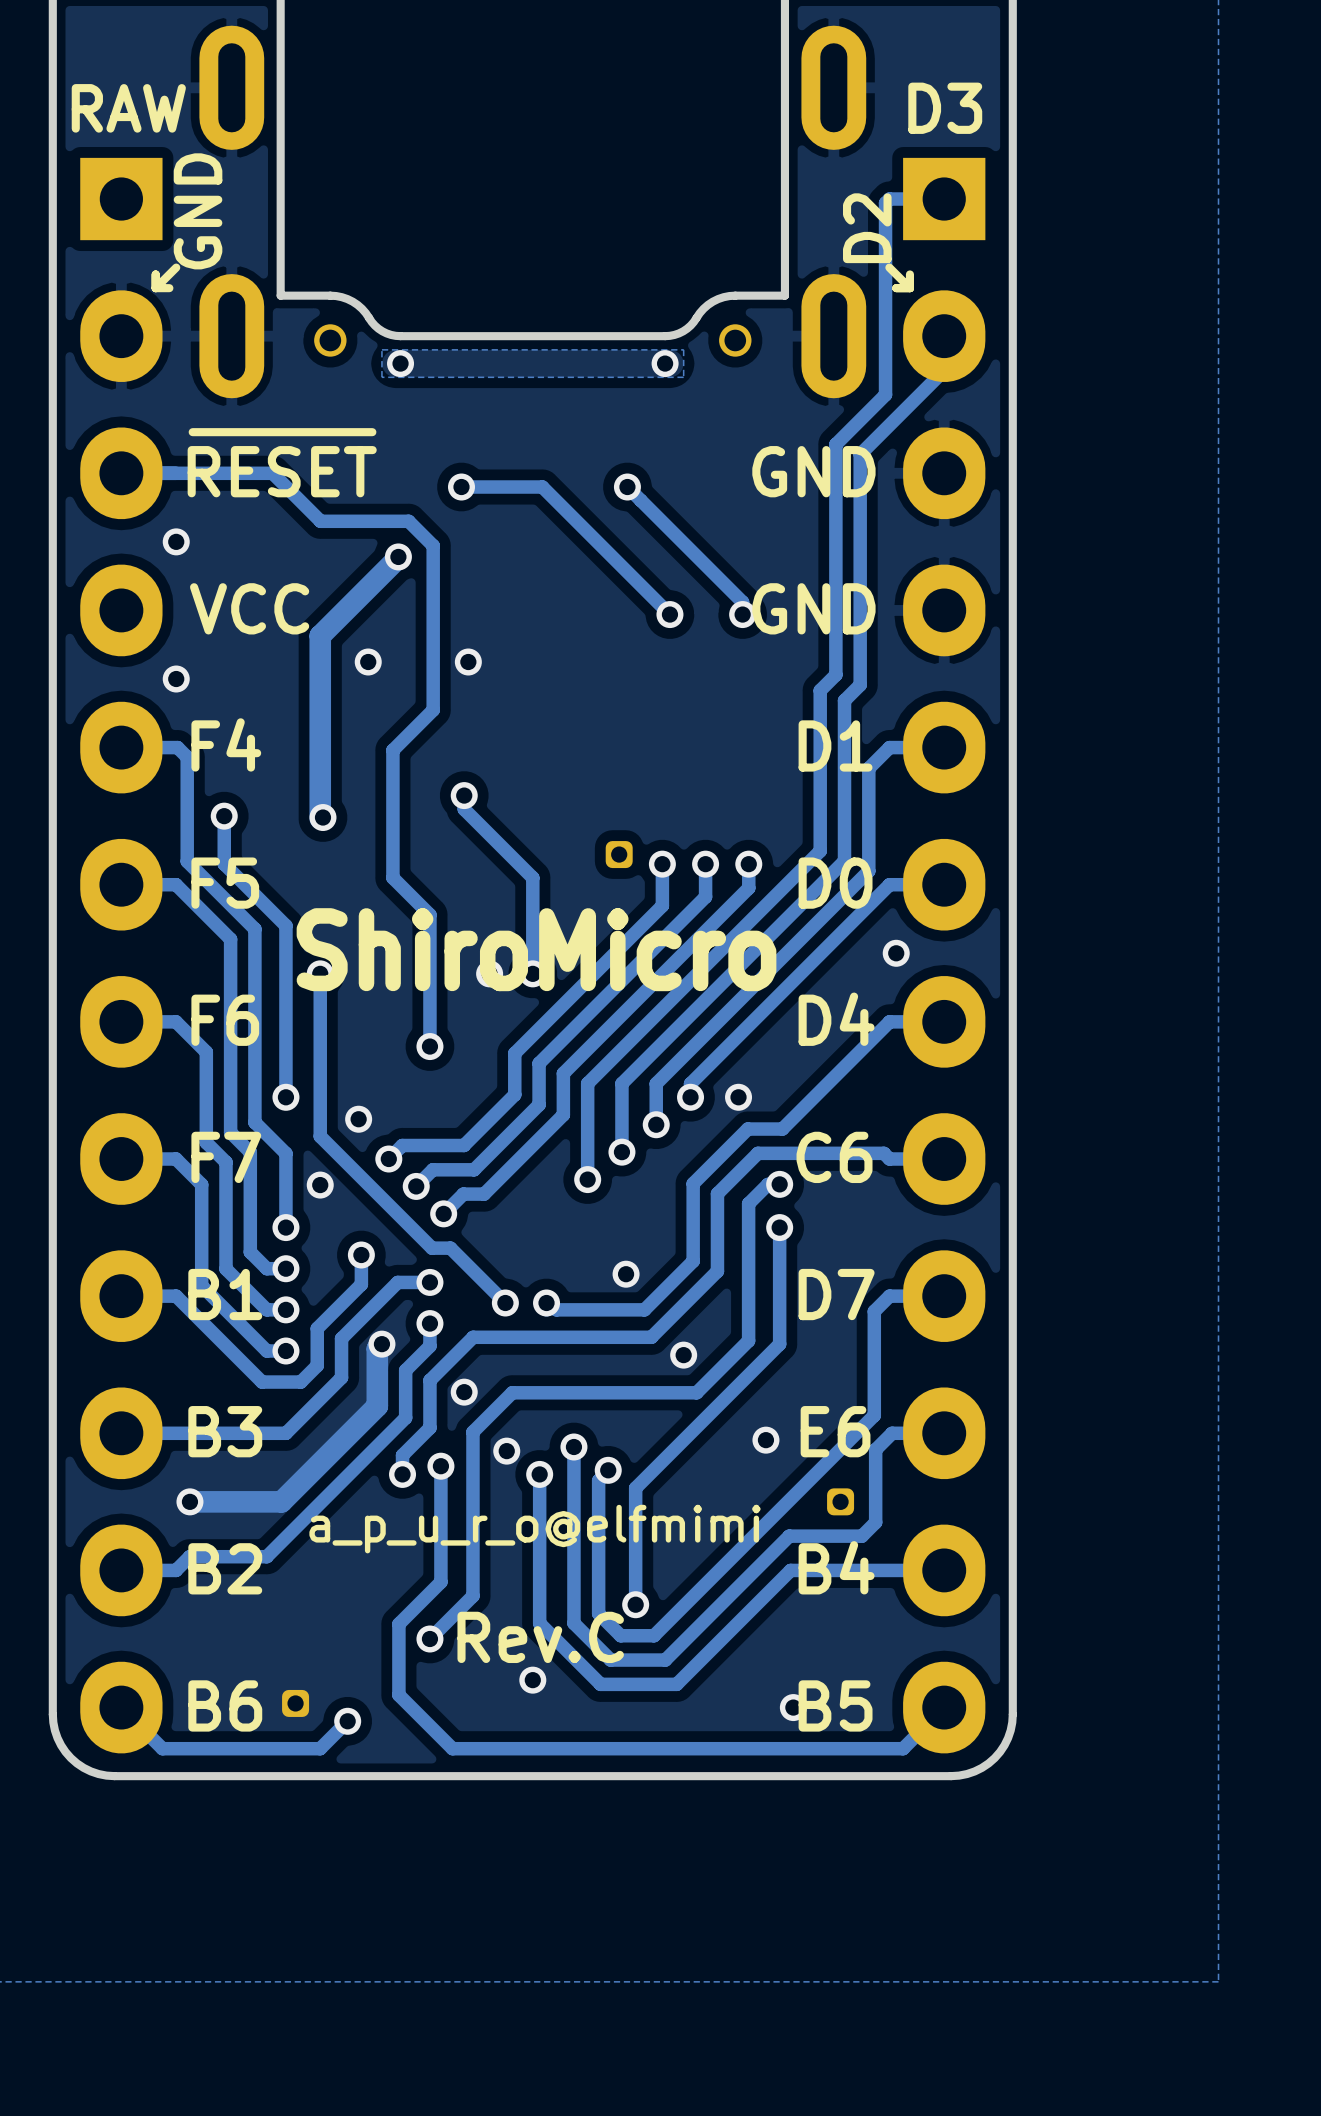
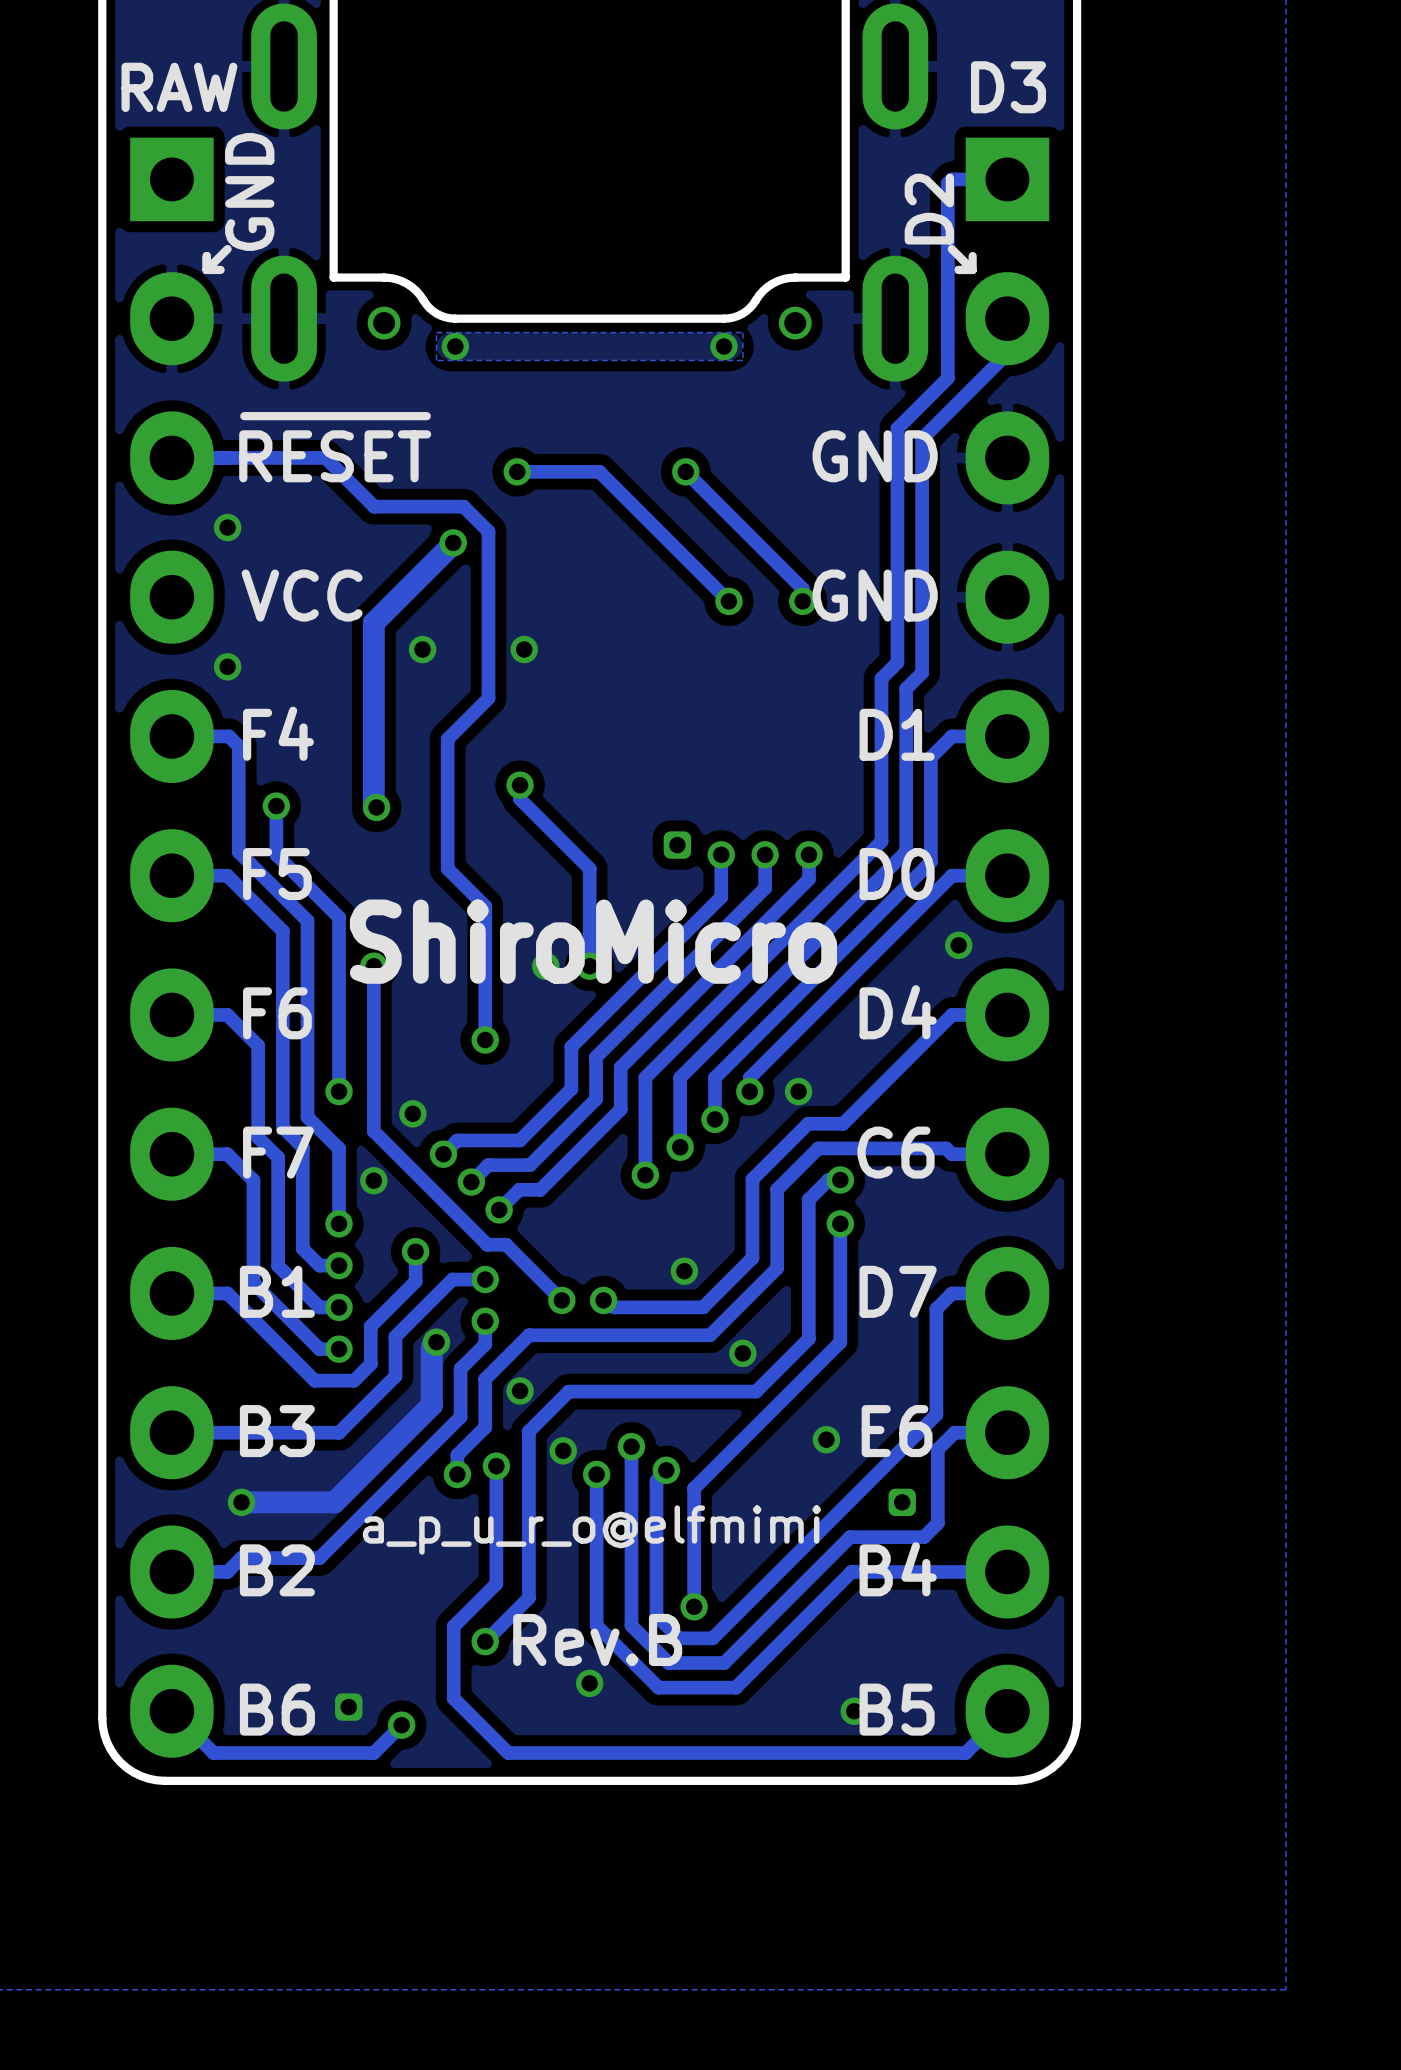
text: Rev.C (540, 1637) -> Rev.B (597, 1639)

